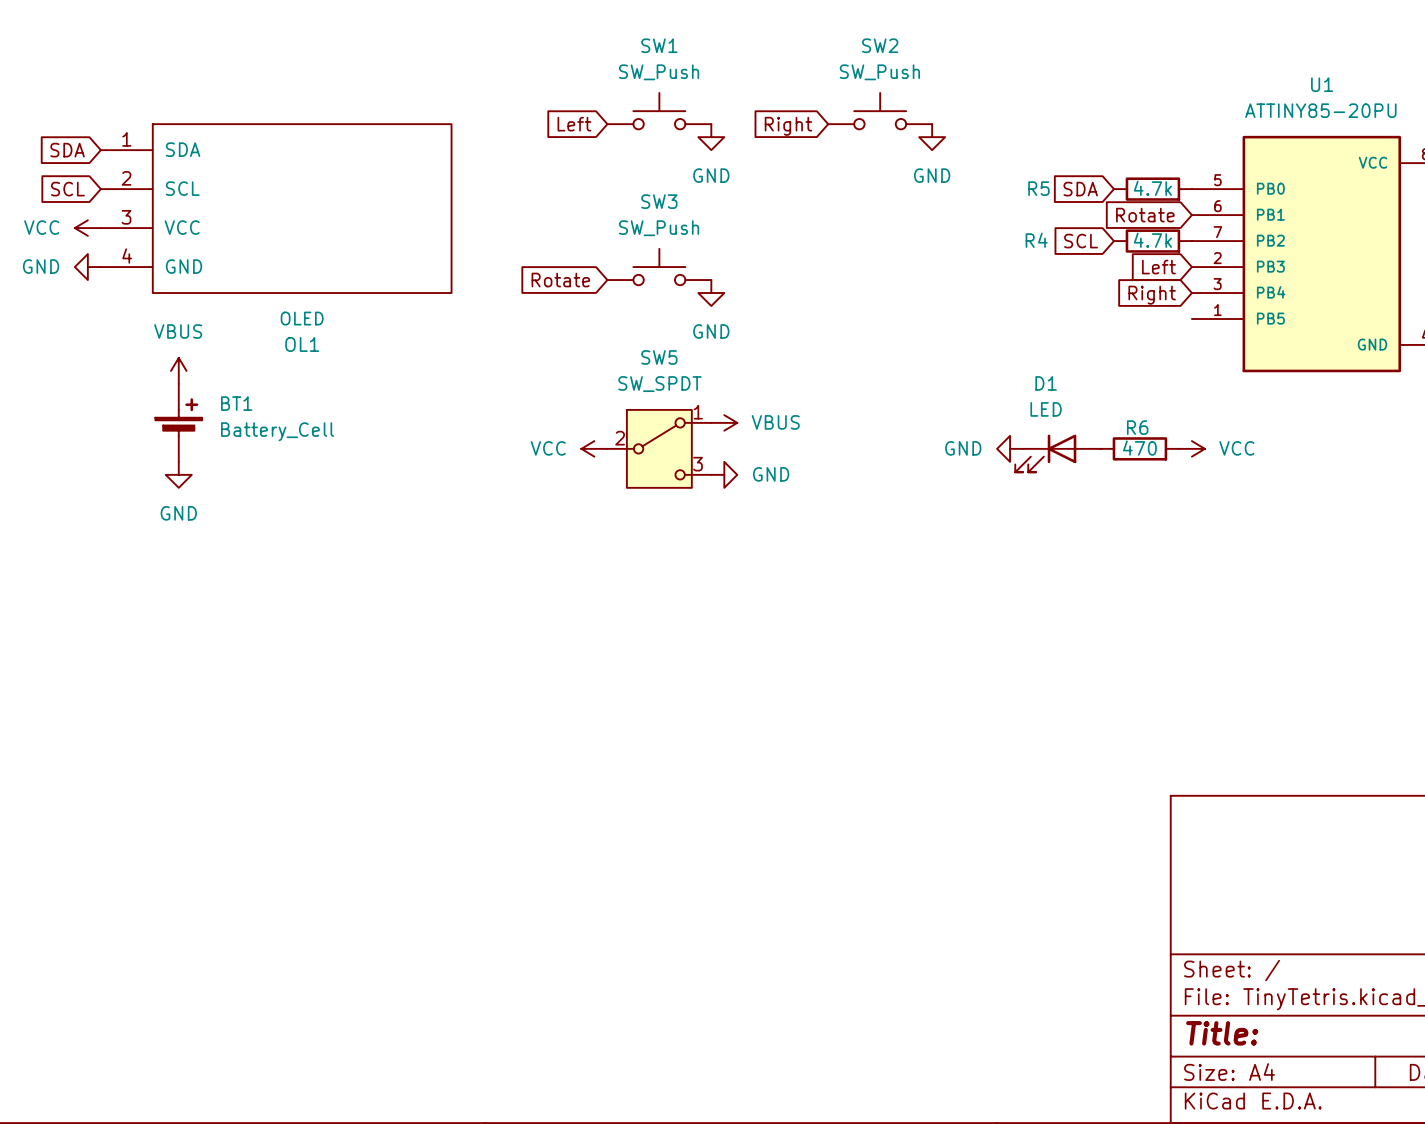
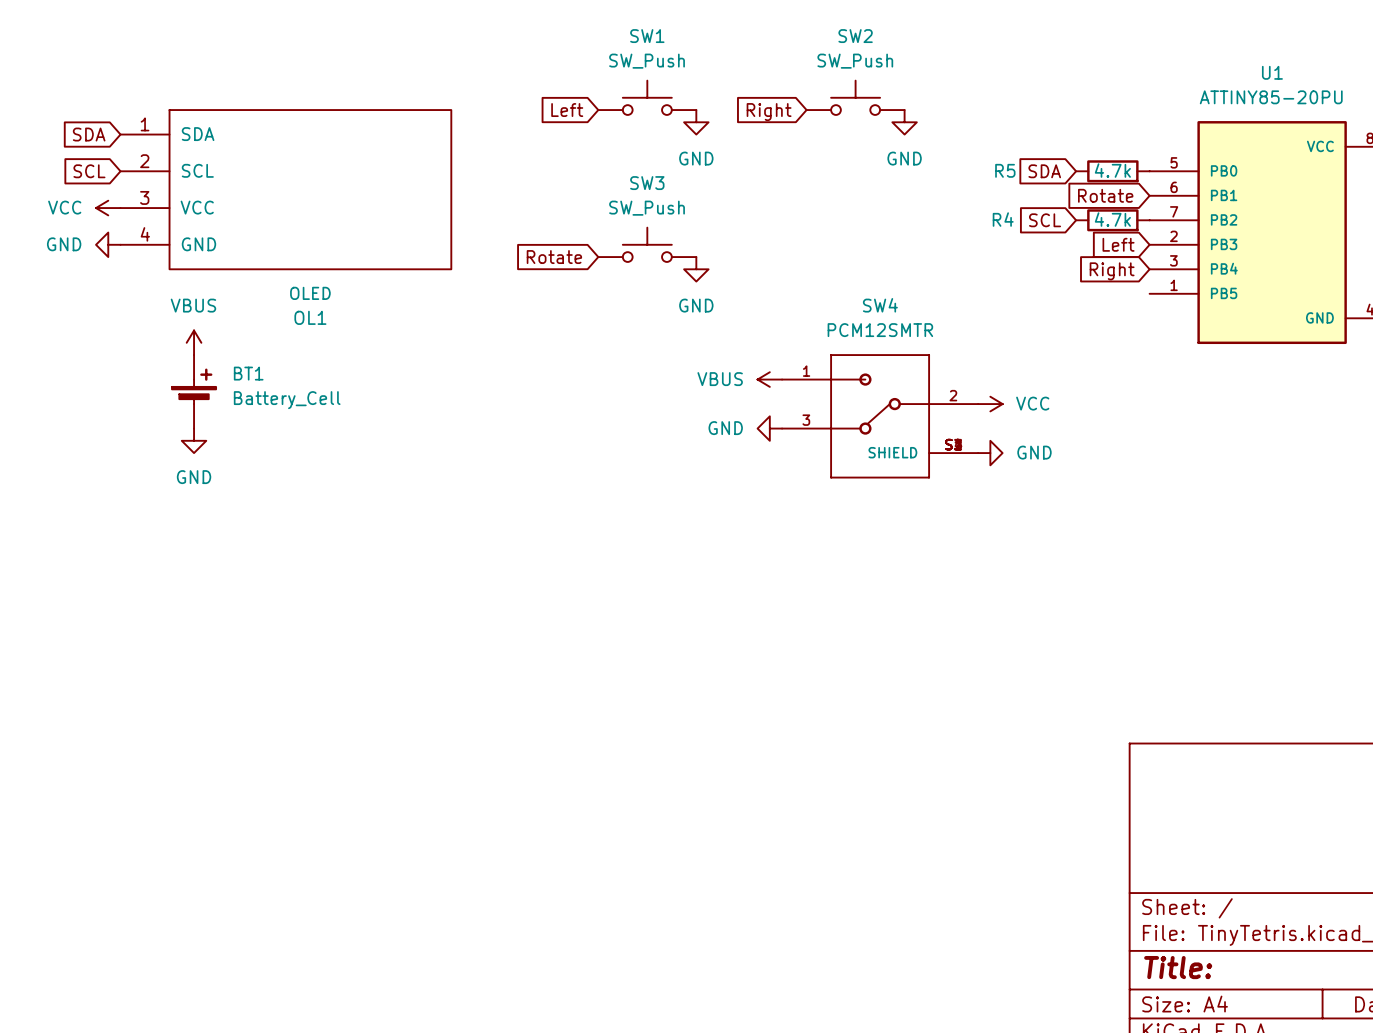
power symbol rotation: 0° (724, 422) -> 180° (769, 379)
power symbol position: VBUS (724, 422) -> VBUS (769, 379)
power symbol: VCC (594, 448) -> none
SW5: SW_SPDT (659, 448) -> none
SW4: none -> PCM12SMTR (880, 416)
power symbol rotation: 0° (1010, 448) -> 180° (990, 453)
power symbol position: GND (1010, 448) -> GND (990, 453)
R6: 470 (1139, 448) -> none
power symbol position: VCC (1191, 448) -> VCC (990, 404)
D1: LED (1058, 453) -> none
power symbol rotation: 0° (724, 474) -> 180° (769, 428)
power symbol position: GND (724, 474) -> GND (769, 428)

